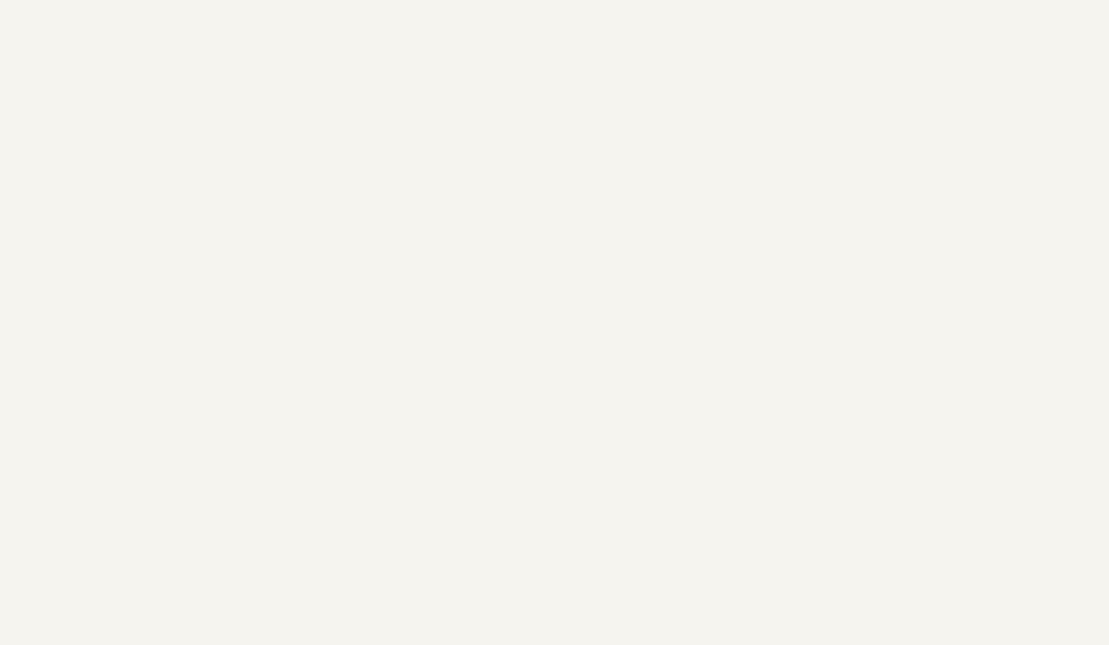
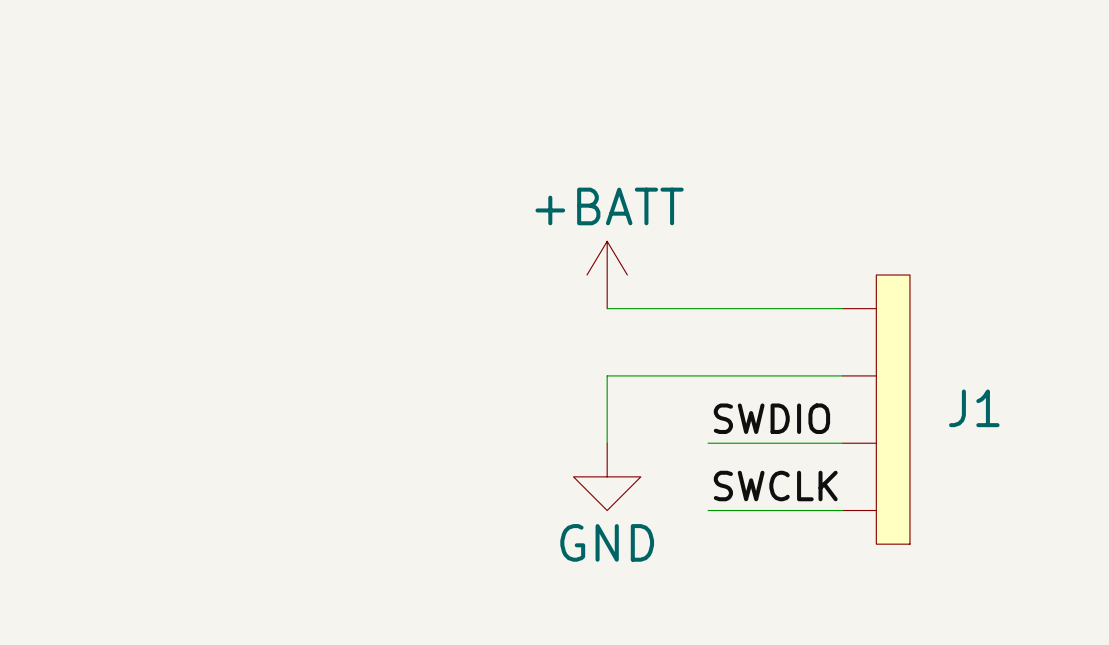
power symbol: none -> +BATT (607, 275)
wire: none -> (607, 308) (842, 308)
wire: none -> (842, 375) (607, 375) (607, 443)
J1: none -> (876, 409)
label: none -> SWDIO (771, 418)
wire: none -> (708, 443) (842, 443)
power symbol: none -> GND (607, 476)
label: none -> SWCLK (775, 486)
wire: none -> (708, 510) (842, 510)

